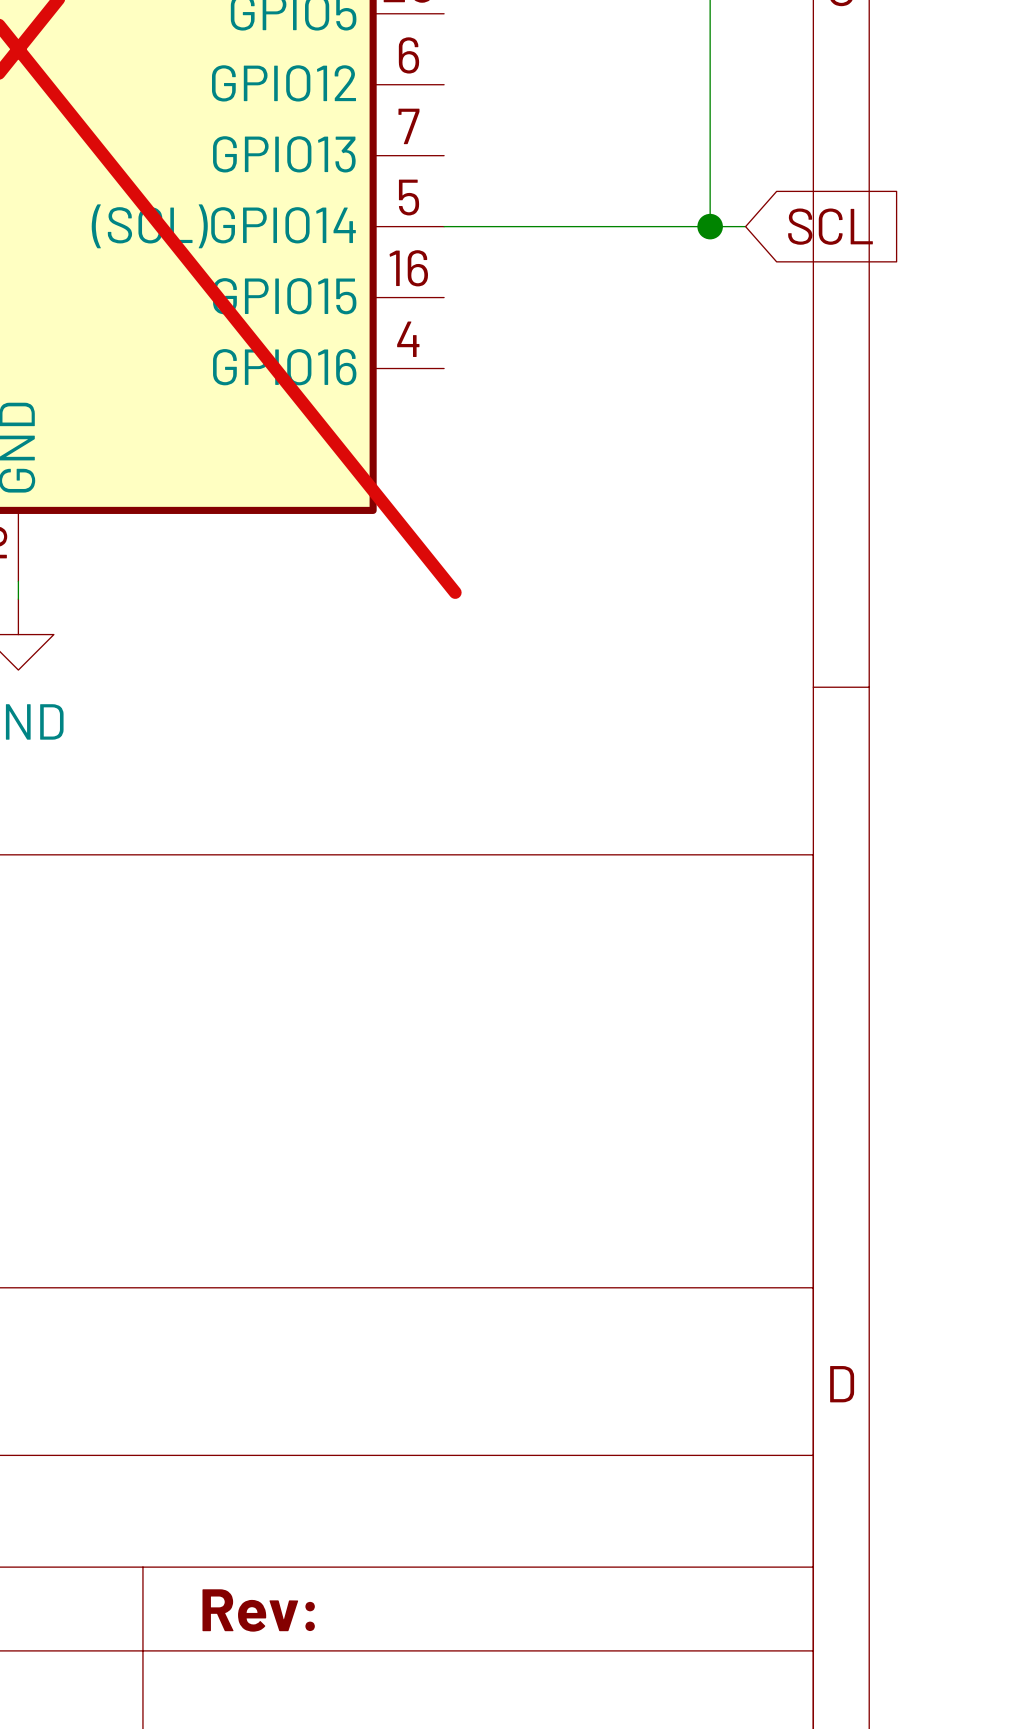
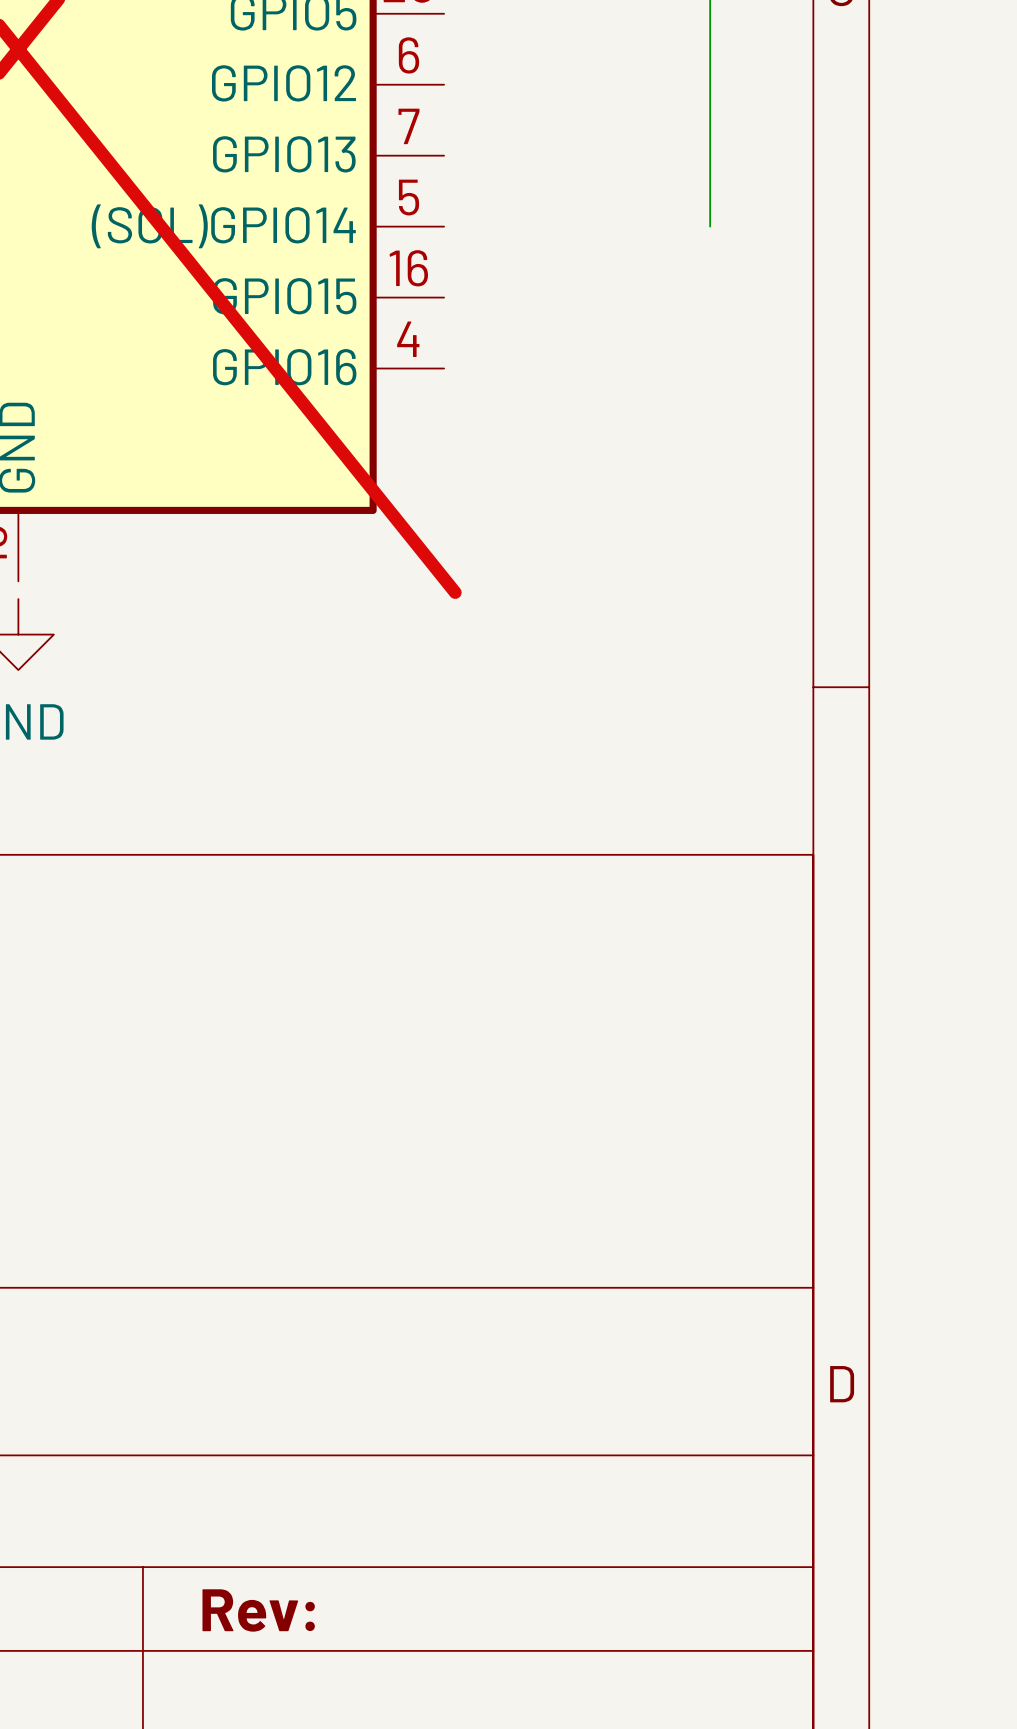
wire: (444, 226) (745, 226) -> none
junction: (710, 226) -> none
global label: SCL (830, 226) -> none
wire: (18, 581) (18, 599) -> none

